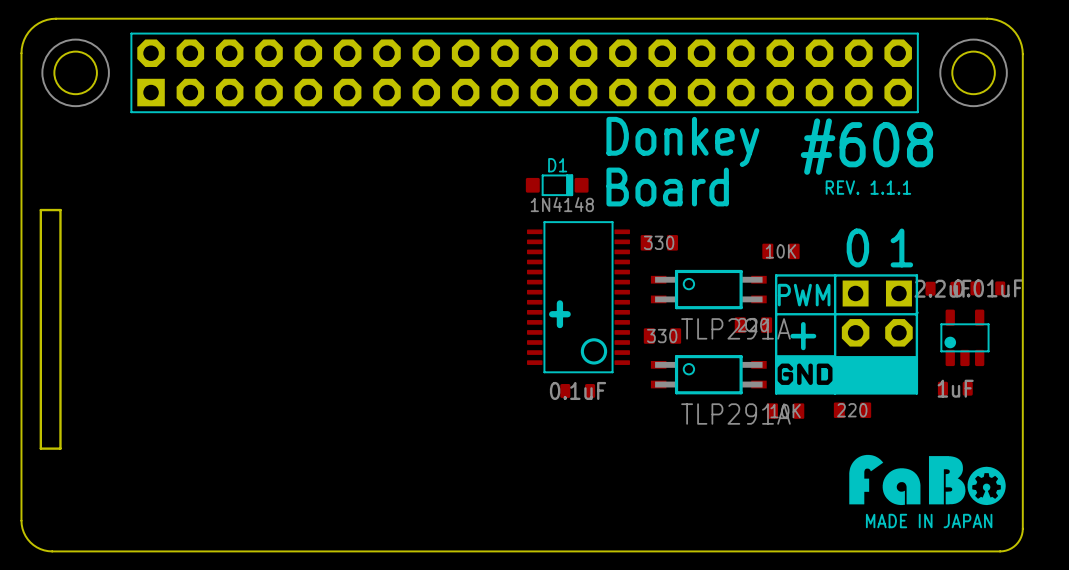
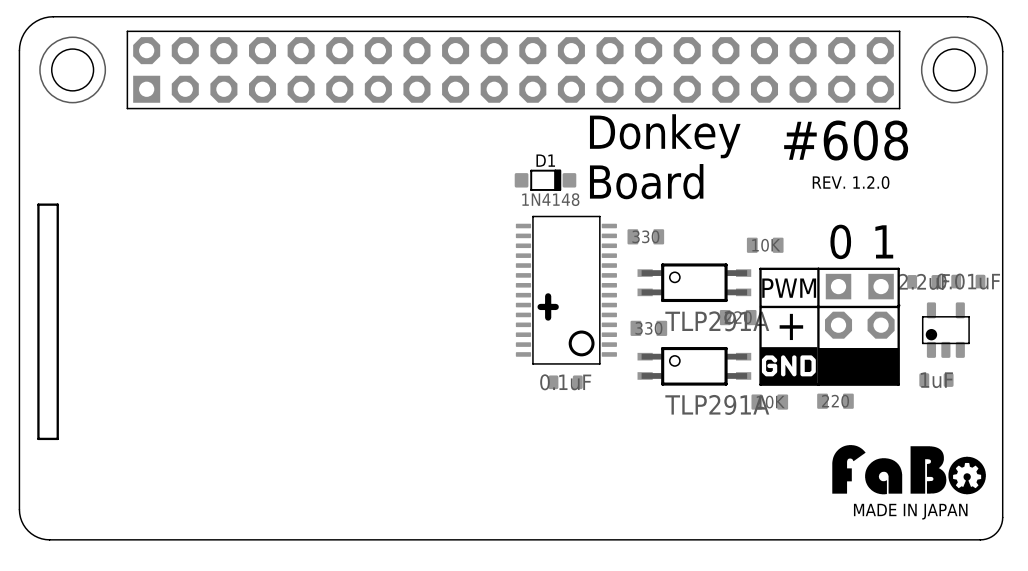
text: REV. 1.1.1 (868, 187) -> REV. 1.2.0 (851, 182)

